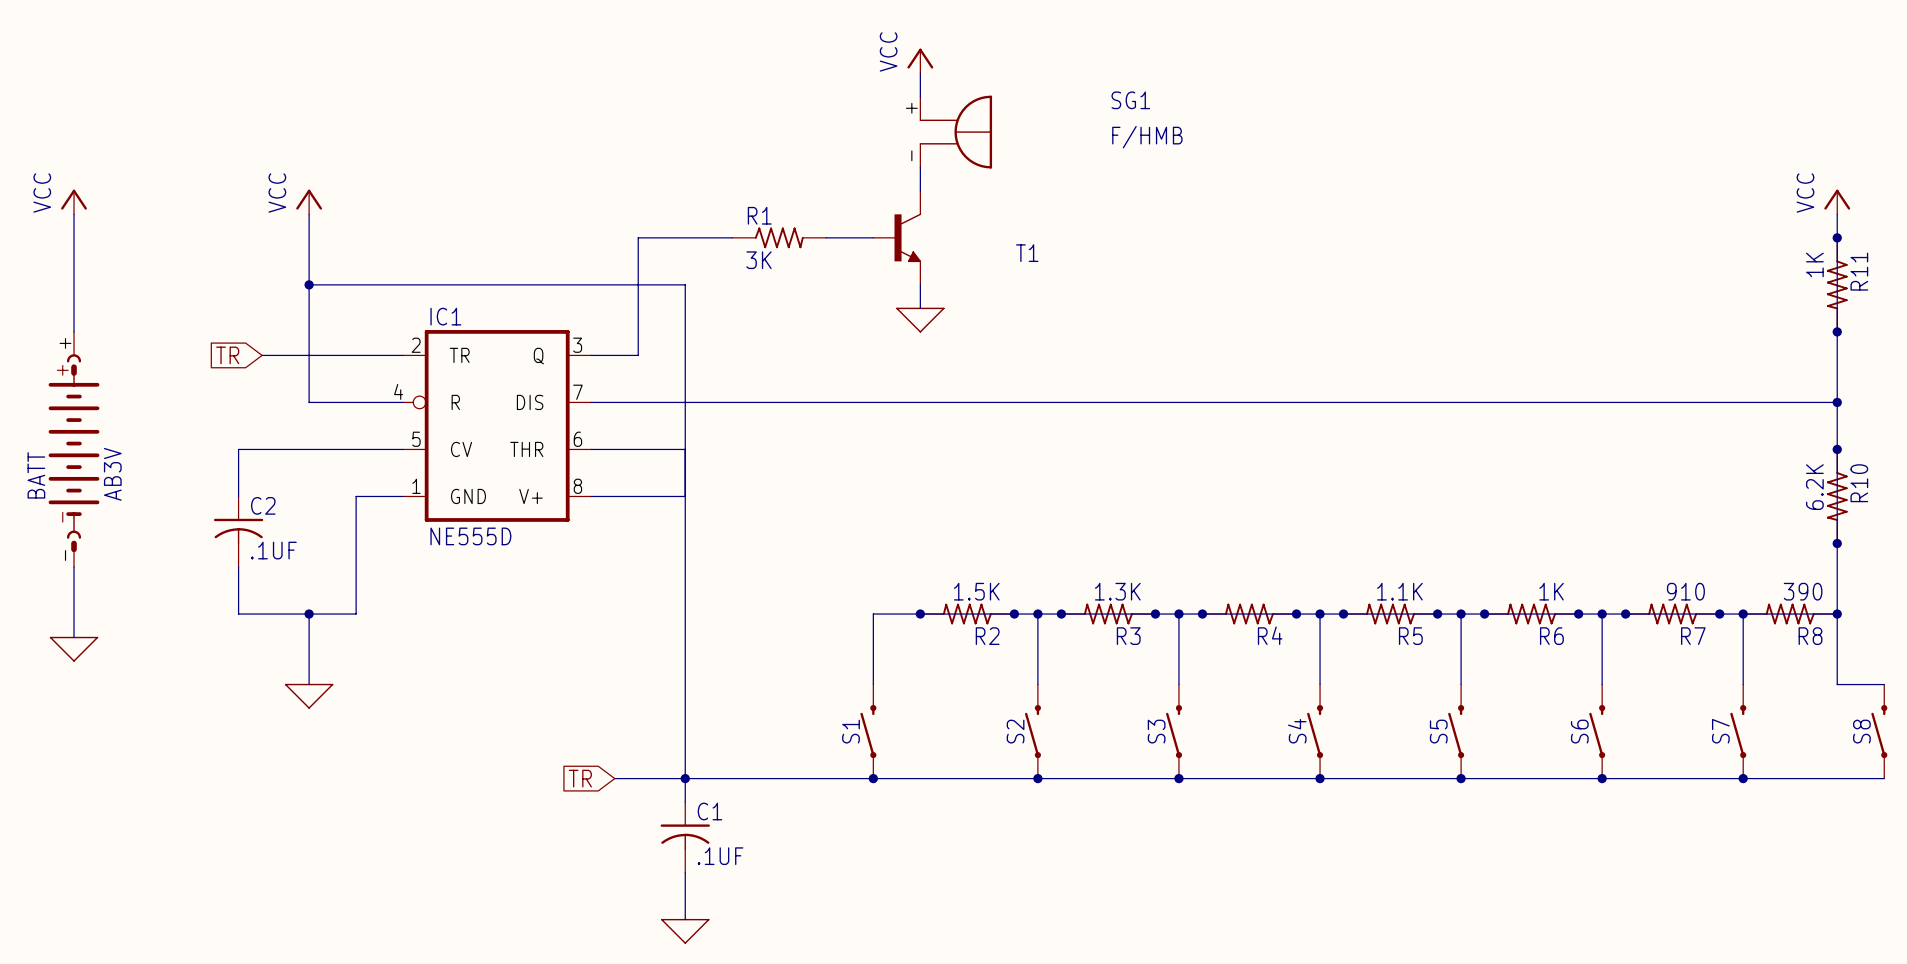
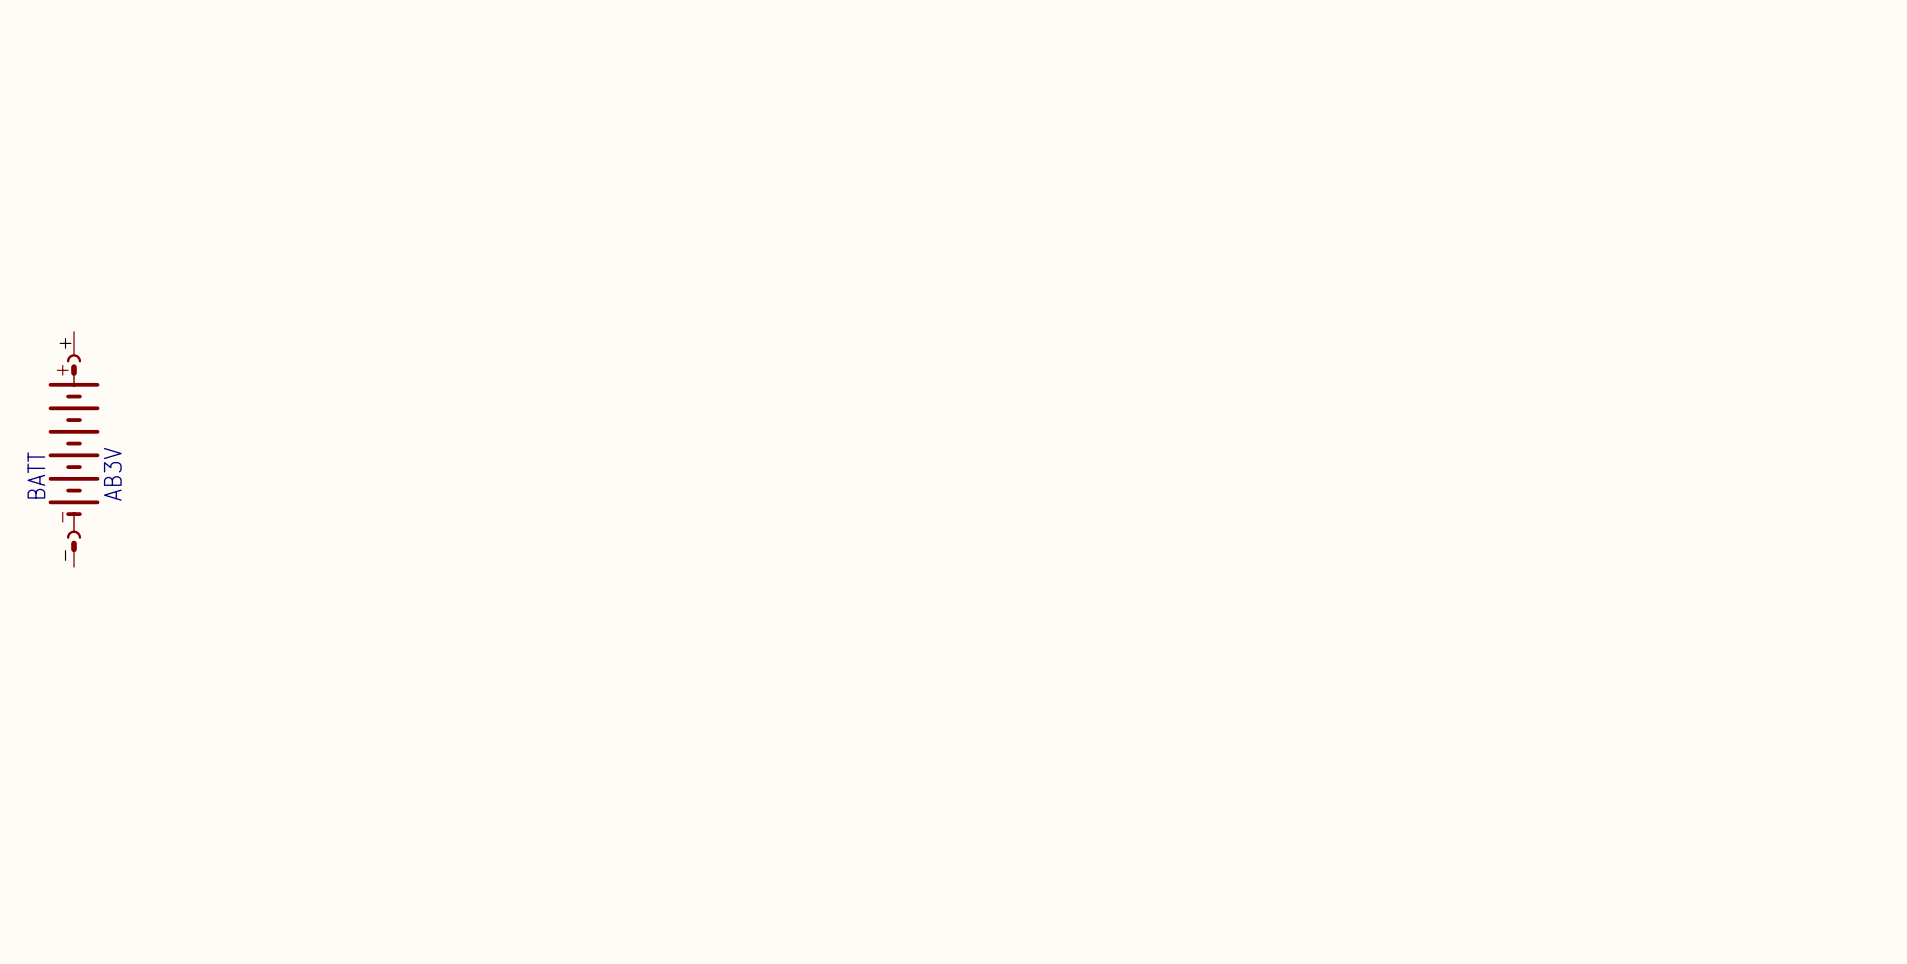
power symbol: VCC (920, 60) -> none
wire: (920, 73) (920, 96) -> none
SG1: F/HMB (955, 132) -> none
wire: (920, 167) (920, 190) -> none
power symbol: VCC (74, 202) -> none
power symbol: VCC (309, 202) -> none
power symbol: VCC (1837, 202) -> none
wire: (74, 214) (74, 331) -> none
wire: (309, 214) (309, 402) (403, 402) -> none
wire: (1837, 214) (1837, 684) (1884, 684) -> none
wire: (732, 237) (638, 237) (638, 355) (591, 355) -> none
R1: 3K (779, 237) -> none
wire: (826, 237) (873, 237) -> none
T1: (897, 237) -> none
junction: (1837, 237) -> none
wire: (309, 284) (685, 284) (685, 802) -> none
junction: (309, 284) -> none
wire: (920, 284) (920, 308) -> none
R11: 1K (1837, 284) -> none
power symbol: (920, 320) -> none
junction: (1837, 331) -> none
global label: TR (227, 355) -> none
wire: (262, 355) (403, 355) -> none
wire: (591, 402) (1837, 402) -> none
junction: (1837, 402) -> none
IC1: NE555D (497, 425) -> none
wire: (403, 449) (238, 449) (238, 496) -> none
wire: (591, 449) (685, 449) -> none
junction: (1837, 449) -> none
wire: (403, 496) (356, 496) (356, 614) (238, 614) (238, 567) -> none
wire: (591, 496) (685, 496) -> none
R10: 6.2K (1837, 496) -> none
C2: .1UF (238, 531) -> none
junction: (1837, 543) -> none
wire: (74, 567) (74, 637) -> none
wire: (309, 614) (309, 684) -> none
junction: (309, 614) -> none
junction: (920, 614) -> none
R2: 1.5K (967, 614) -> none
junction: (1014, 614) -> none
wire: (1037, 614) (1037, 684) -> none
junction: (1037, 614) -> none
junction: (1061, 614) -> none
R3: 1.3K (1108, 614) -> none
junction: (1155, 614) -> none
wire: (1178, 614) (1178, 684) -> none
junction: (1178, 614) -> none
junction: (1202, 614) -> none
R4: (1249, 614) -> none
junction: (1296, 614) -> none
wire: (1320, 614) (1320, 684) -> none
junction: (1320, 614) -> none
junction: (1343, 614) -> none
R5: 1.1K (1390, 614) -> none
junction: (1437, 614) -> none
wire: (1461, 614) (1461, 684) -> none
junction: (1461, 614) -> none
junction: (1484, 614) -> none
R6: 1K (1531, 614) -> none
junction: (1578, 614) -> none
wire: (1602, 614) (1602, 684) -> none
junction: (1602, 614) -> none
junction: (1625, 614) -> none
R7: 910 (1672, 614) -> none
junction: (1719, 614) -> none
wire: (1743, 614) (1743, 684) -> none
junction: (1743, 614) -> none
R8: 390 (1790, 614) -> none
wire: (1837, 614) (873, 614) (873, 684) -> none
junction: (1837, 614) -> none
power symbol: (74, 649) -> none
power symbol: (309, 696) -> none
S1: (868, 731) -> none
S2: (1032, 731) -> none
S3: (1174, 731) -> none
S4: (1315, 731) -> none
S5: (1456, 731) -> none
S6: (1597, 731) -> none
S7: (1738, 731) -> none
S8: (1879, 731) -> none
global label: TR (580, 778) -> none
wire: (614, 778) (1884, 778) -> none
junction: (685, 778) -> none
junction: (873, 778) -> none
junction: (1037, 778) -> none
junction: (1178, 778) -> none
junction: (1320, 778) -> none
junction: (1461, 778) -> none
junction: (1602, 778) -> none
junction: (1743, 778) -> none
C1: .1UF (685, 837) -> none
wire: (685, 872) (685, 919) -> none
power symbol: (685, 931) -> none

